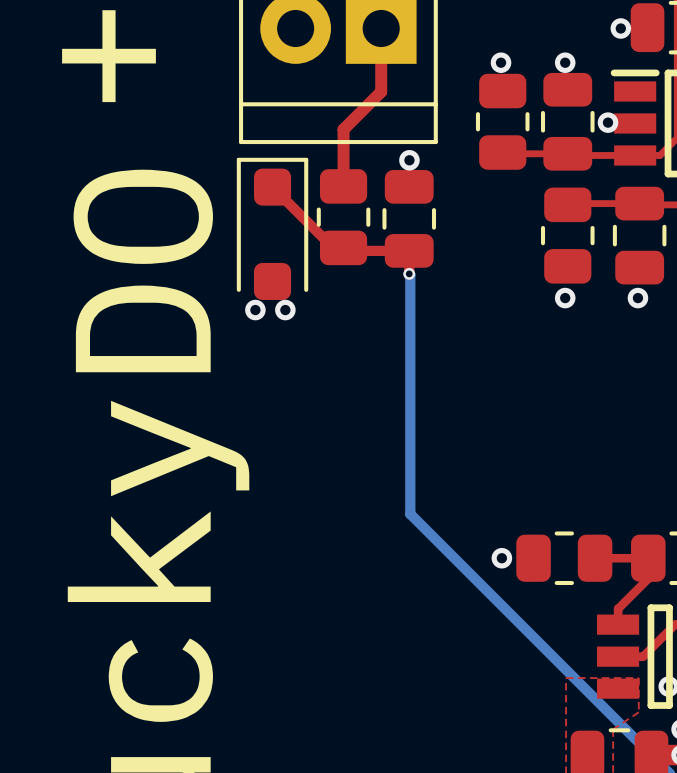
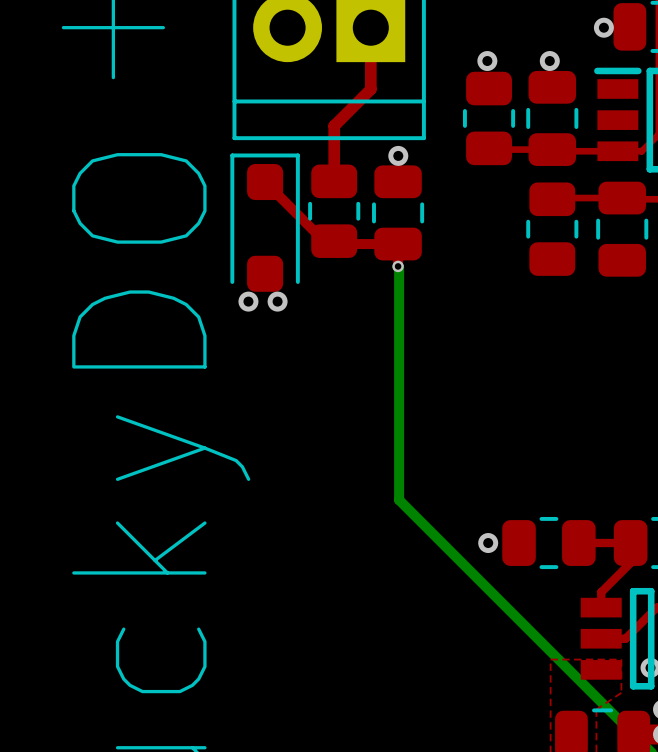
via: (608, 122) -> none
via: (565, 298) -> none
via: (637, 298) -> none

